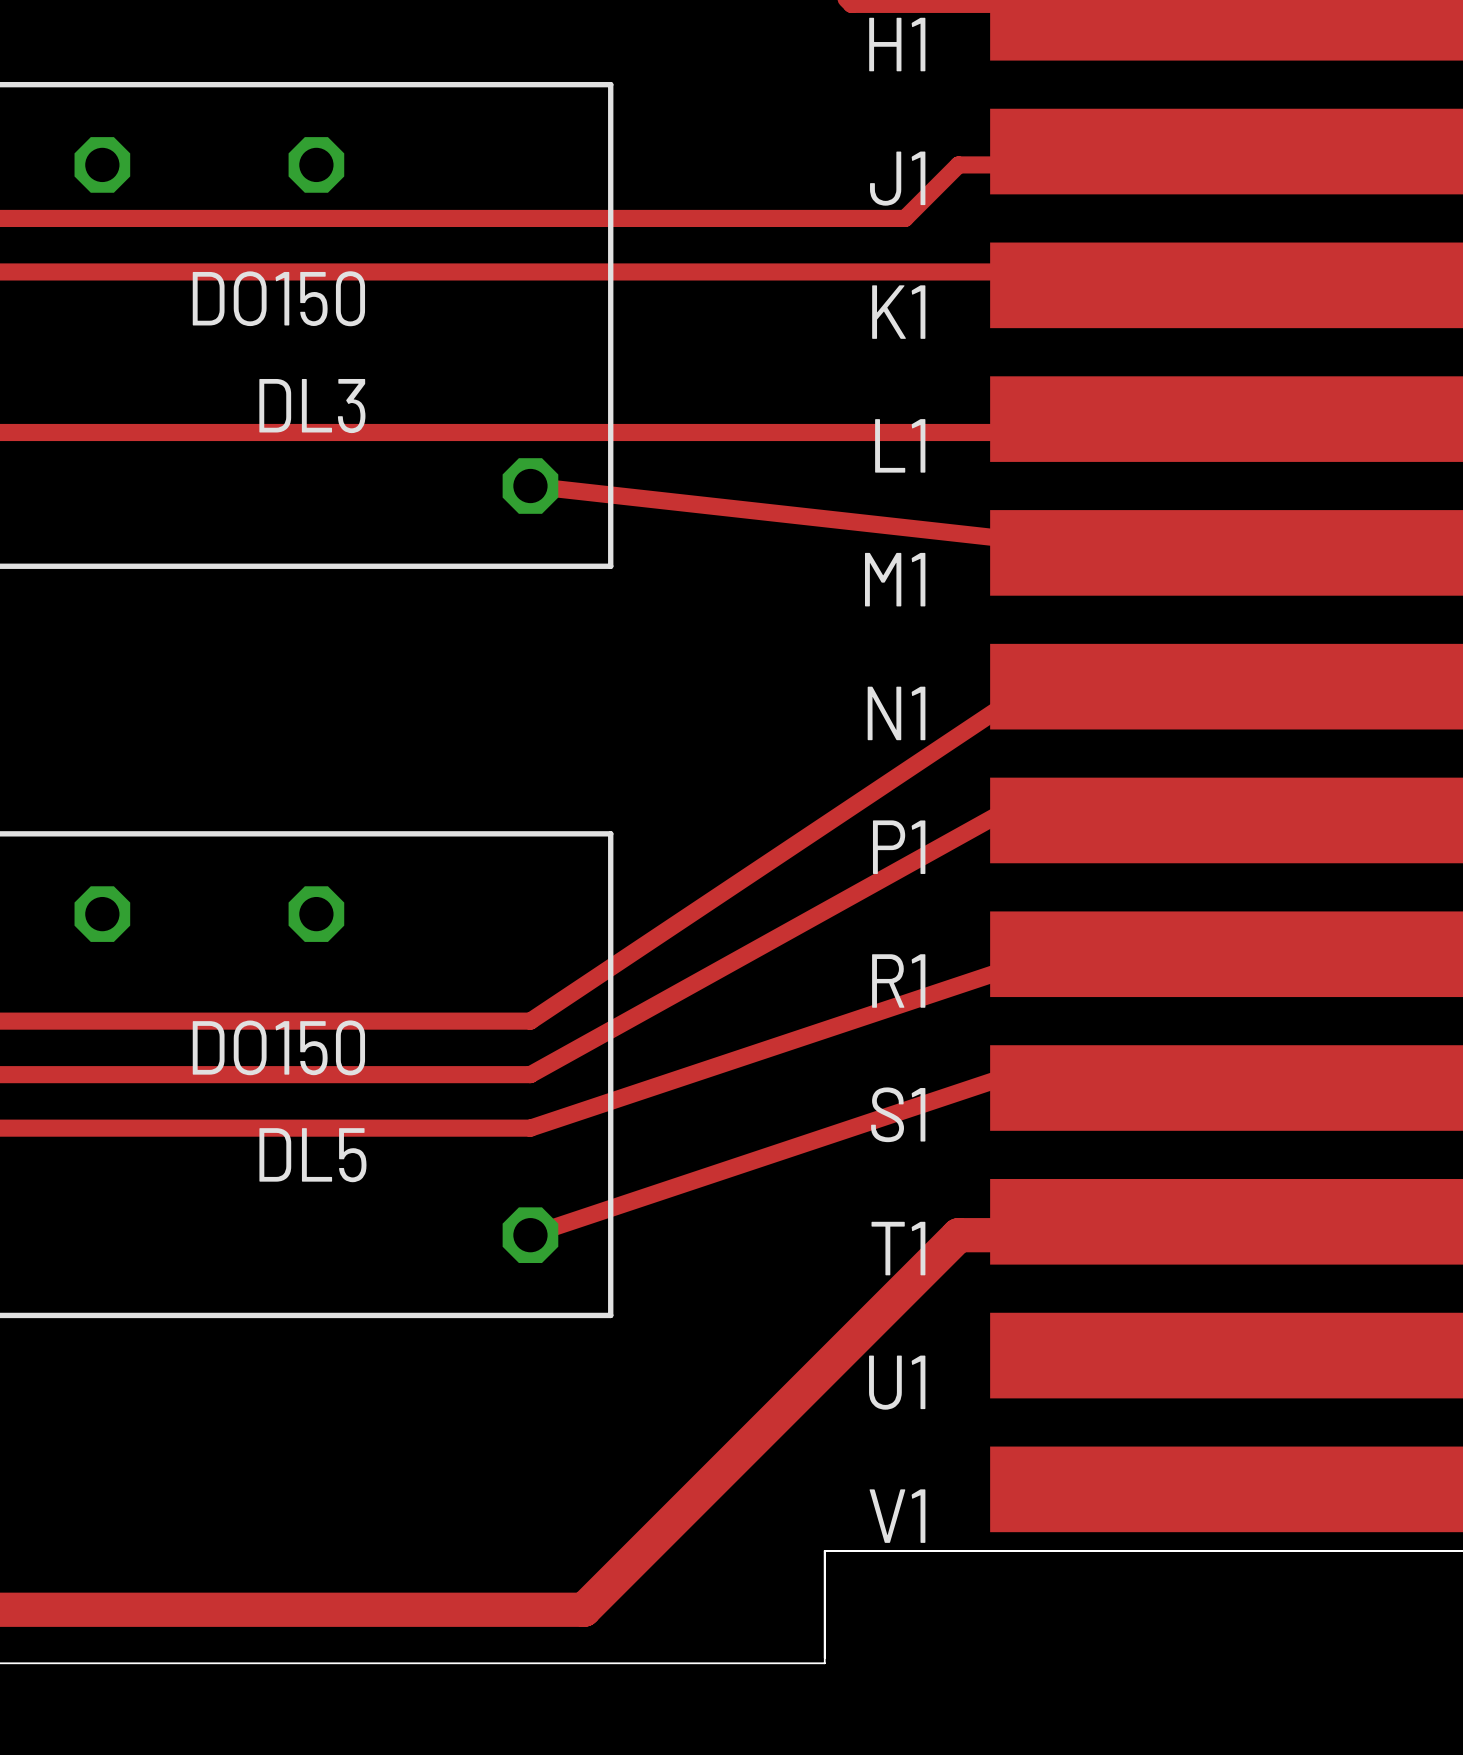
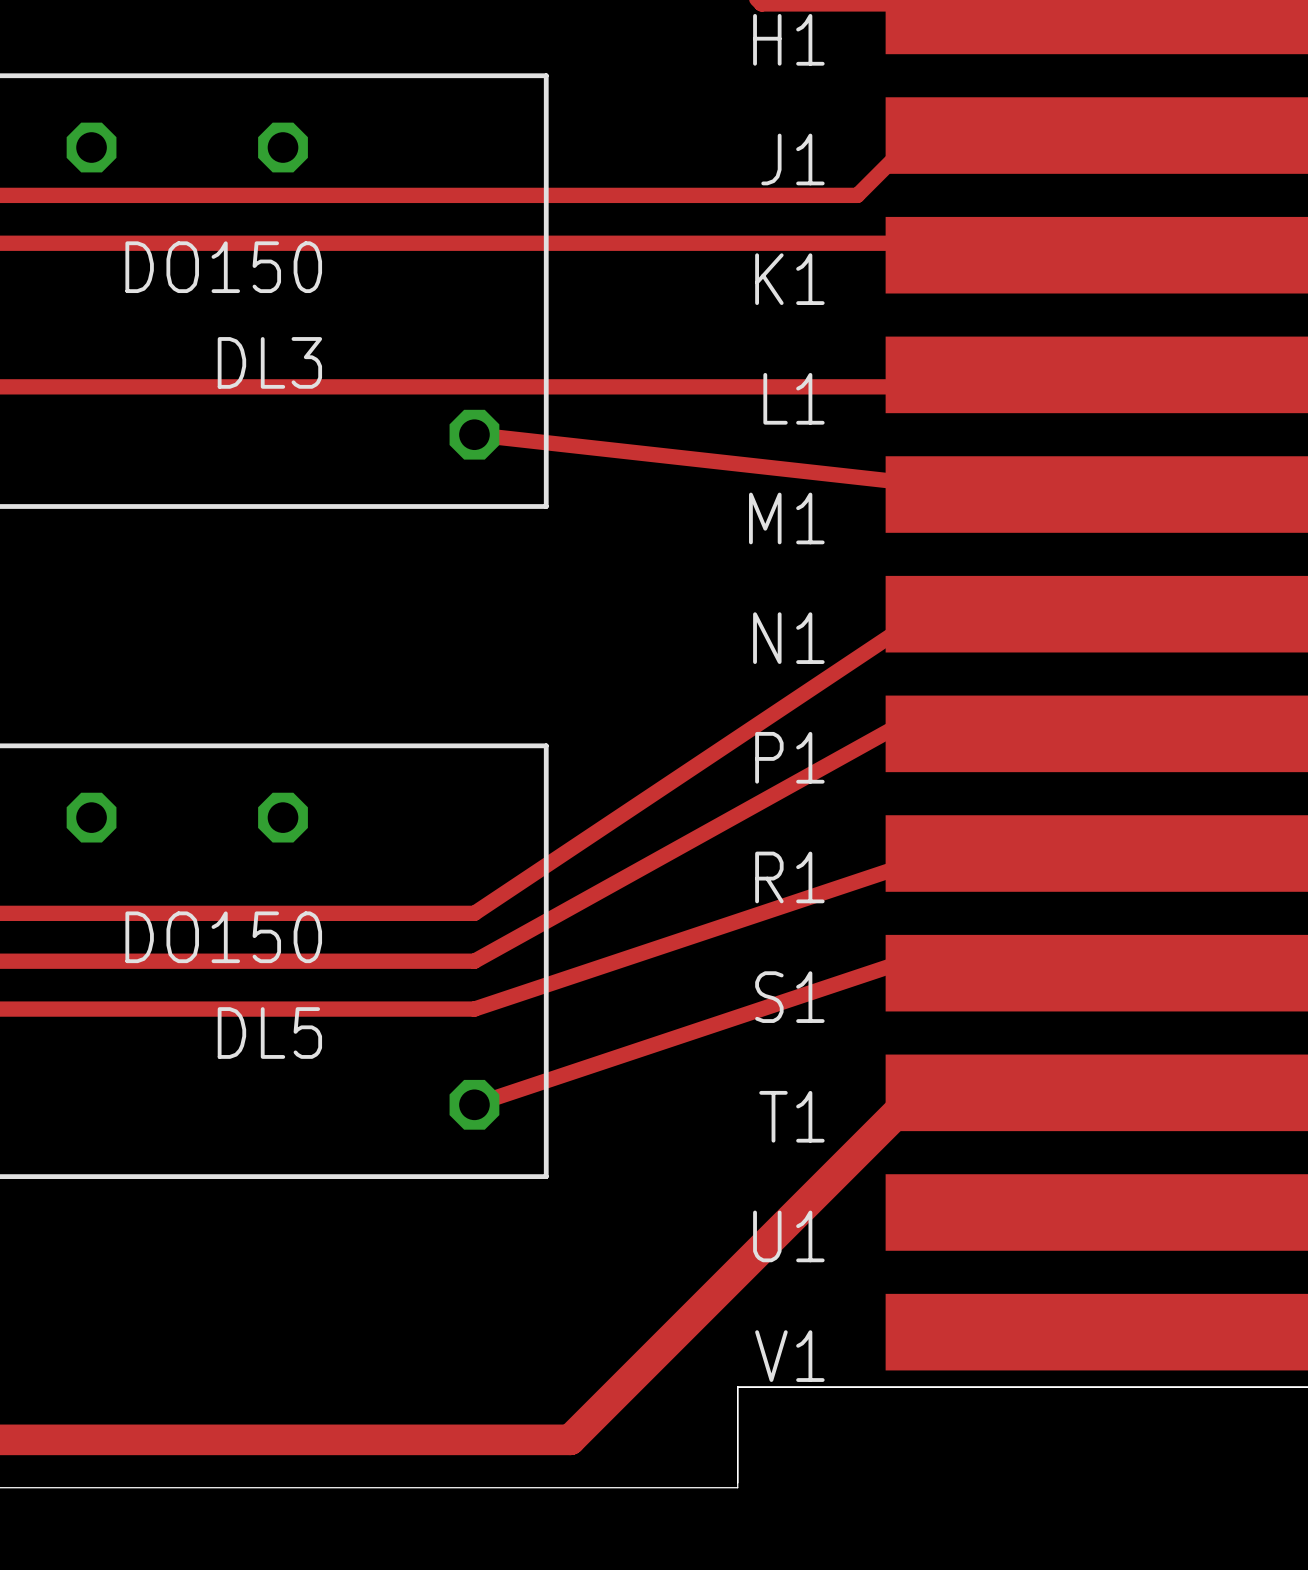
track: (1012, 164) (958, 164) (905, 218) -> (905, 147) (857, 195) (809, 195)
track: (1012, 1235) (958, 1235) (583, 1609) -> (905, 1104) (570, 1439) (522, 1439)

